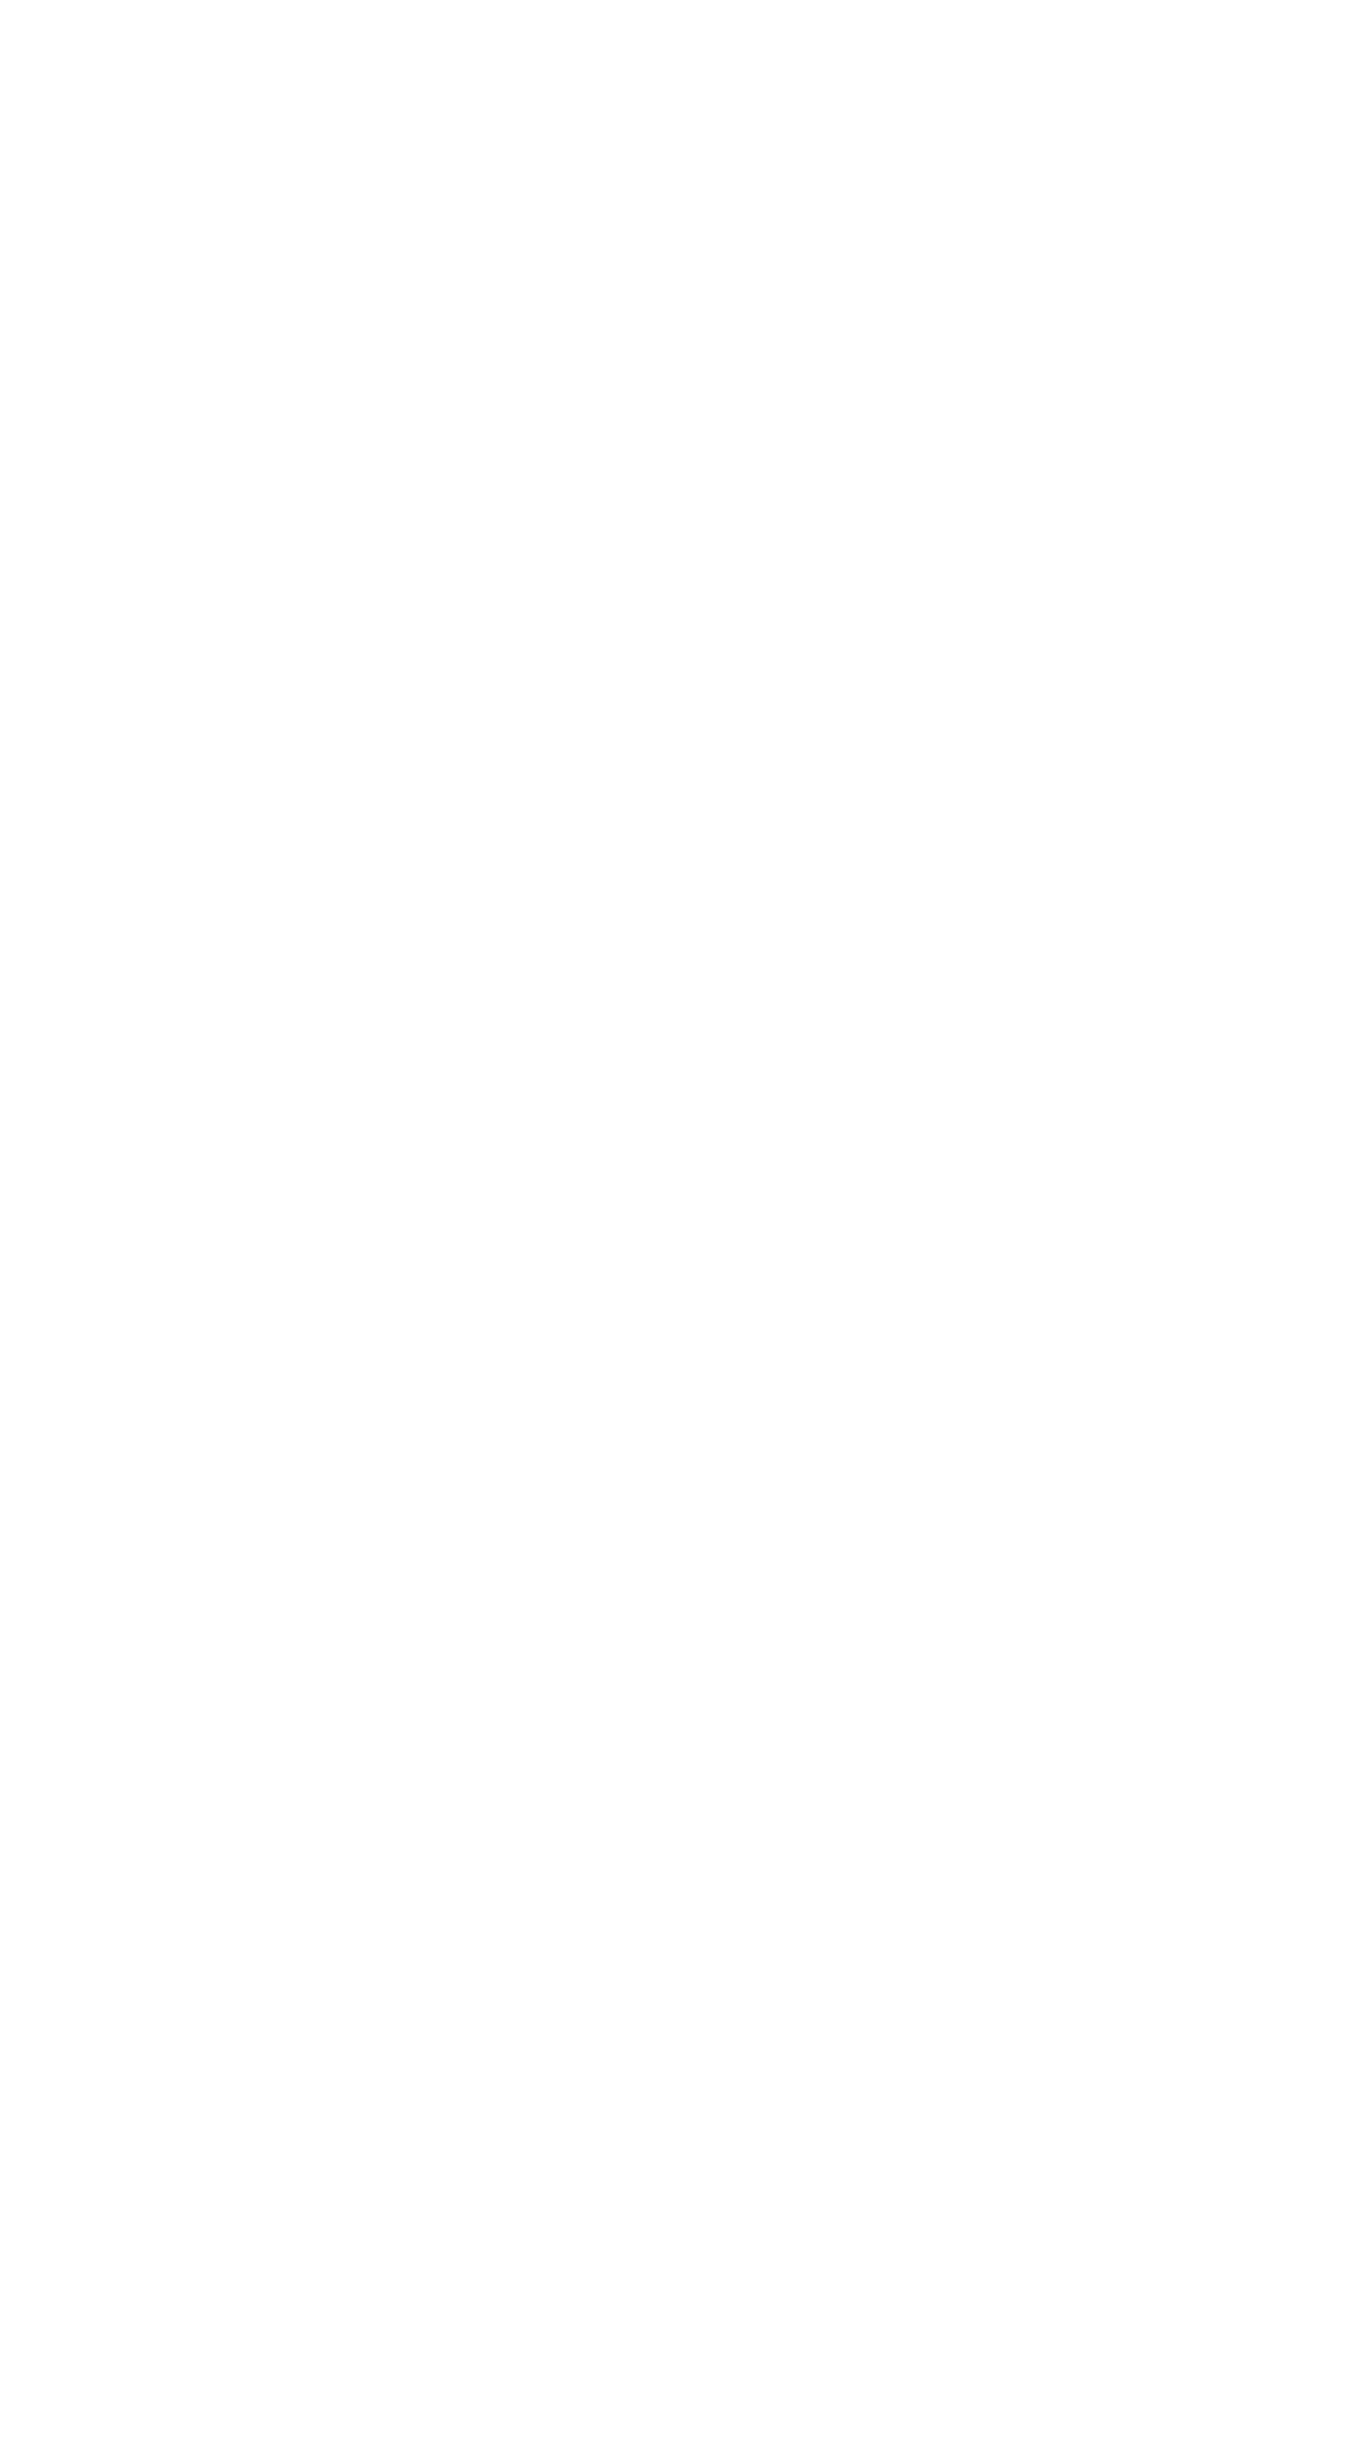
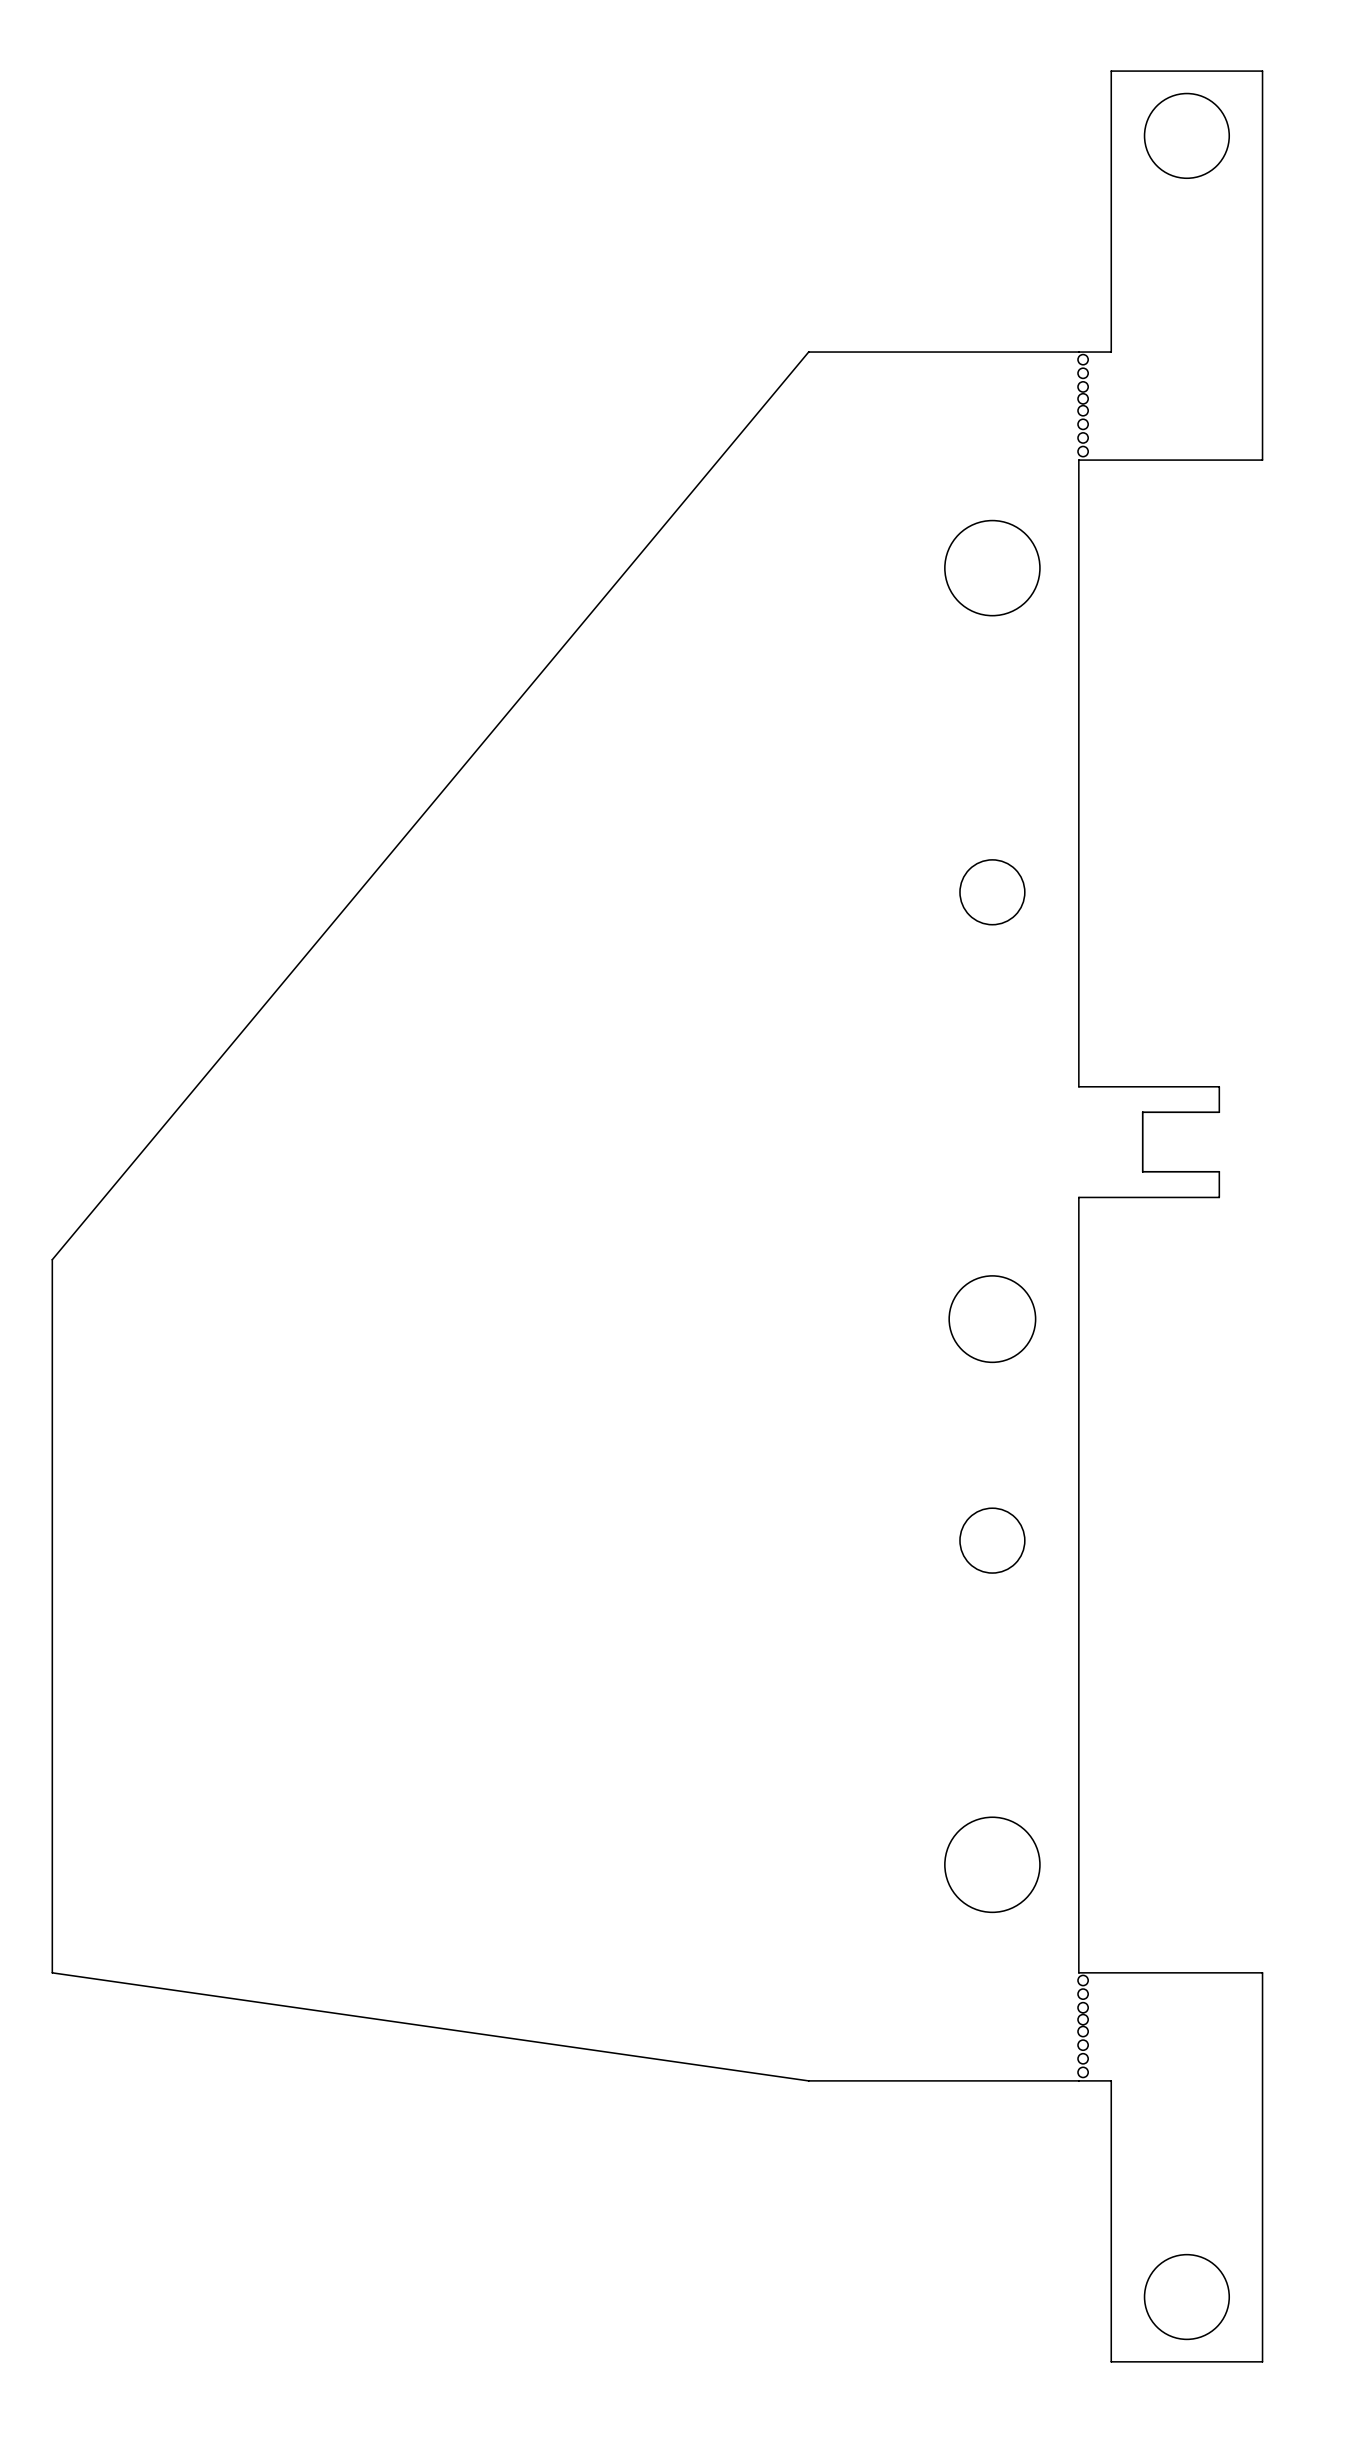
round board edge: none -> [1144, 93, 1230, 179]
round board edge: none -> [1077, 354, 1089, 366]
round board edge: none -> [1077, 367, 1089, 379]
round board edge: none -> [1077, 381, 1089, 393]
round board edge: none -> [1077, 393, 1089, 405]
round board edge: none -> [1077, 405, 1089, 417]
round board edge: none -> [1077, 418, 1089, 430]
round board edge: none -> [1077, 432, 1089, 444]
round board edge: none -> [1077, 446, 1089, 458]
round board edge: none -> [944, 520, 1041, 617]
round board edge: none -> [959, 859, 1026, 926]
board edge: none -> (1219, 1112) (1219, 1086) (1078, 1086) (1078, 460) (1262, 460) (1262, 71) (1111, 71) (1111, 352) (808, 352) (52, 1259) (52, 1972) (808, 2080) (1111, 2080) (1111, 2361) (1262, 2361) (1262, 1972) (1078, 1972) (1078, 1197) (1219, 1197) (1219, 1171)
part: none -> (1181, 1142)
round board edge: none -> [948, 1275, 1037, 1363]
round board edge: none -> [959, 1507, 1026, 1574]
round board edge: none -> [944, 1816, 1041, 1913]
round board edge: none -> [1077, 1974, 1089, 1987]
round board edge: none -> [1077, 1988, 1089, 2000]
round board edge: none -> [1077, 2002, 1089, 2014]
round board edge: none -> [1077, 2014, 1089, 2026]
round board edge: none -> [1077, 2026, 1089, 2038]
round board edge: none -> [1077, 2039, 1089, 2051]
round board edge: none -> [1077, 2053, 1089, 2065]
round board edge: none -> [1077, 2066, 1089, 2078]
round board edge: none -> [1144, 2254, 1230, 2340]

